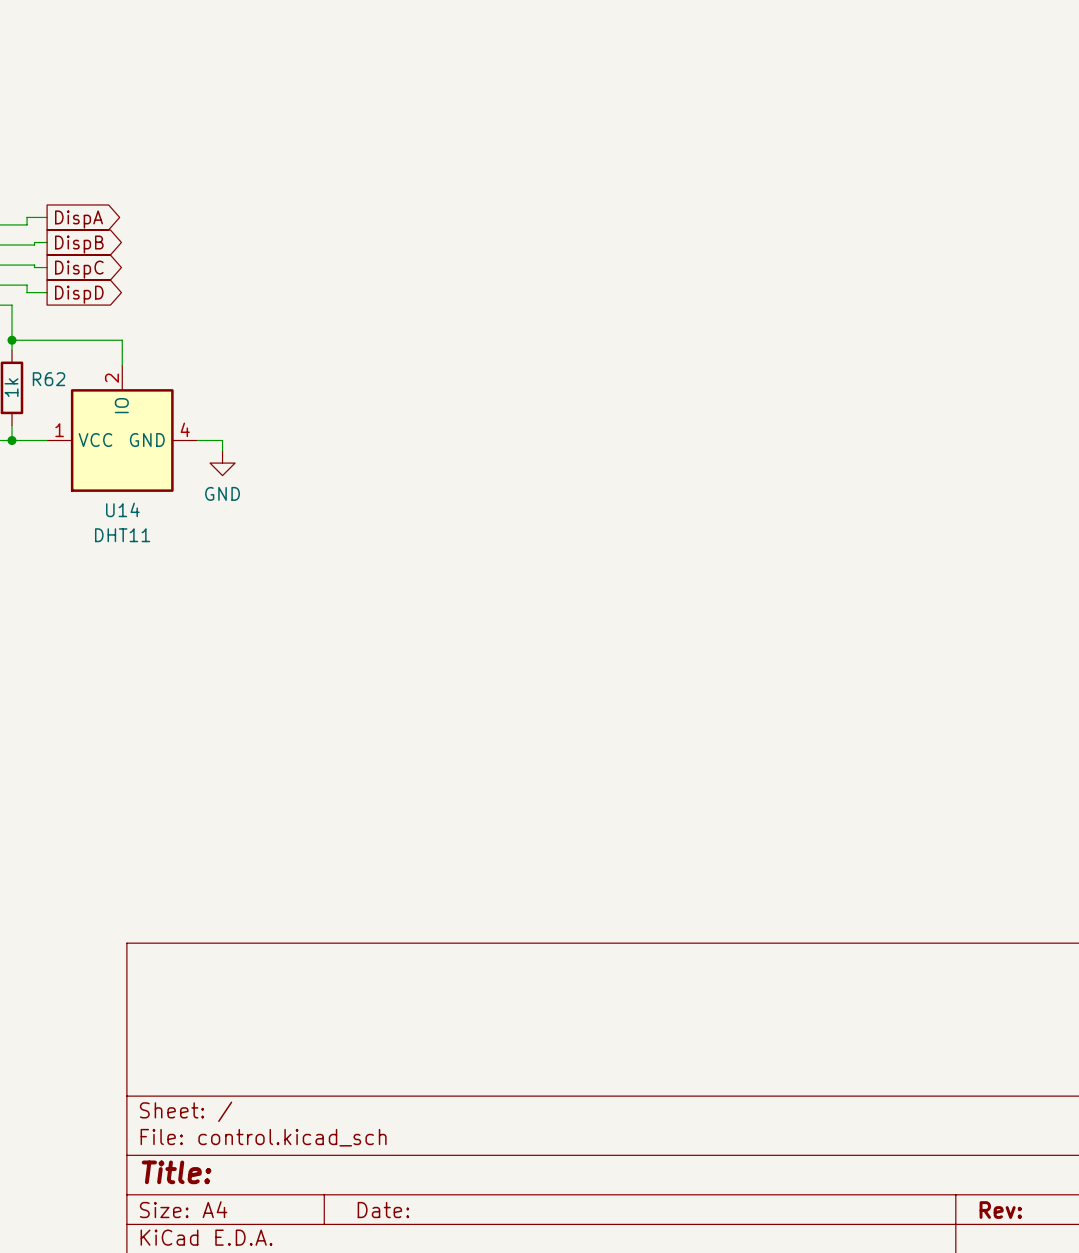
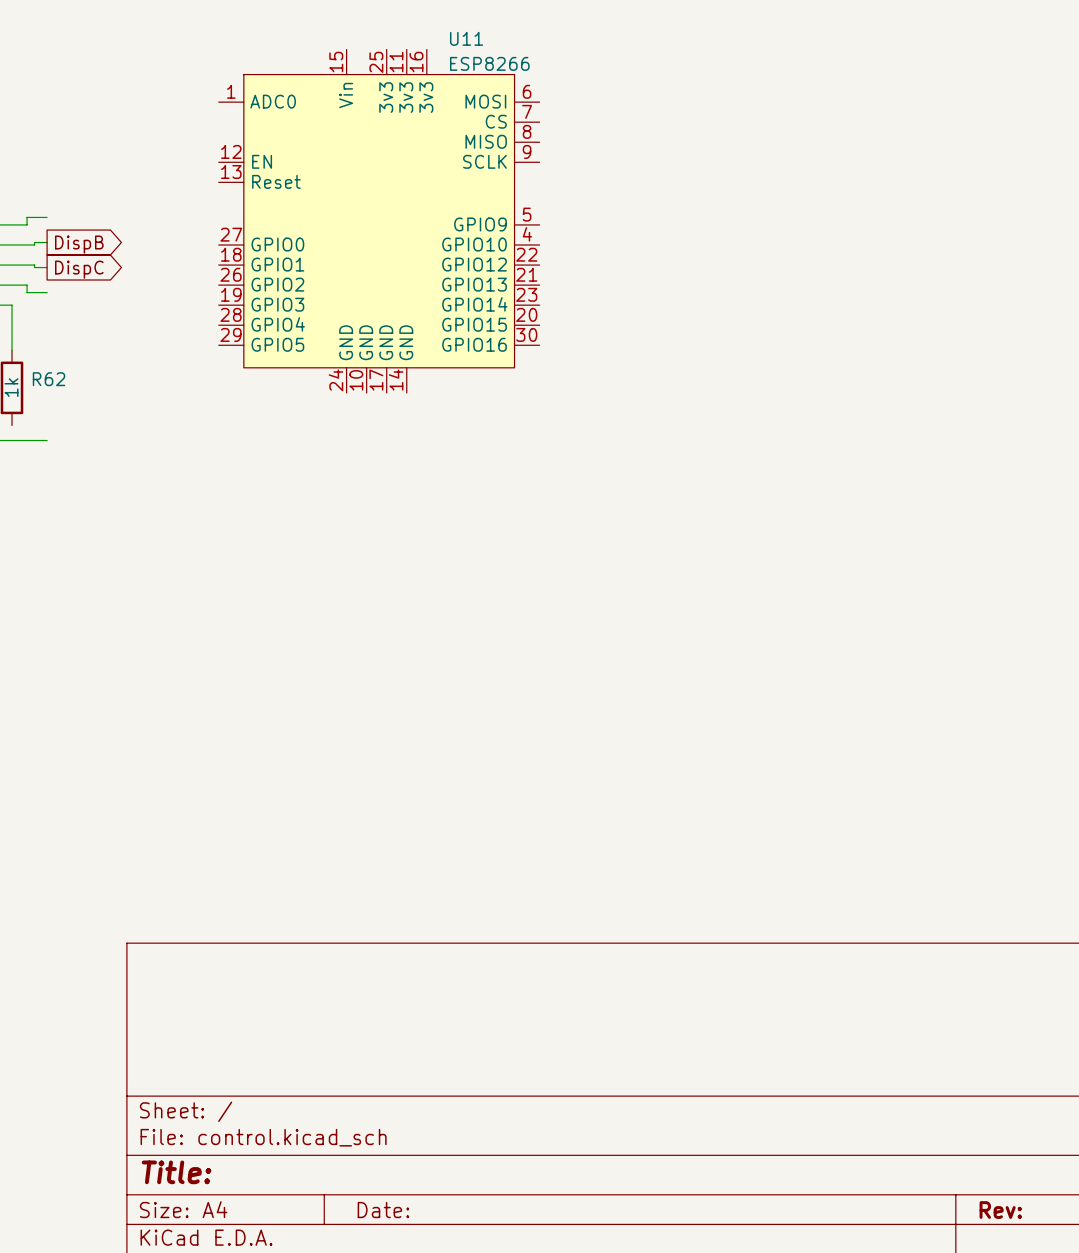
global label: DispA (79, 219) -> none
U11: none -> ESP8266 (379, 221)
global label: DispD (79, 294) -> none
wire: (11, 340) (122, 340) (122, 365) -> none
junction: (11, 340) -> none
wire: (11, 425) (11, 440) -> none
U14: DHT11 (122, 428) -> none
junction: (11, 440) -> none
wire: (197, 440) (222, 440) (222, 450) -> none
power symbol: GND (222, 463) -> none

